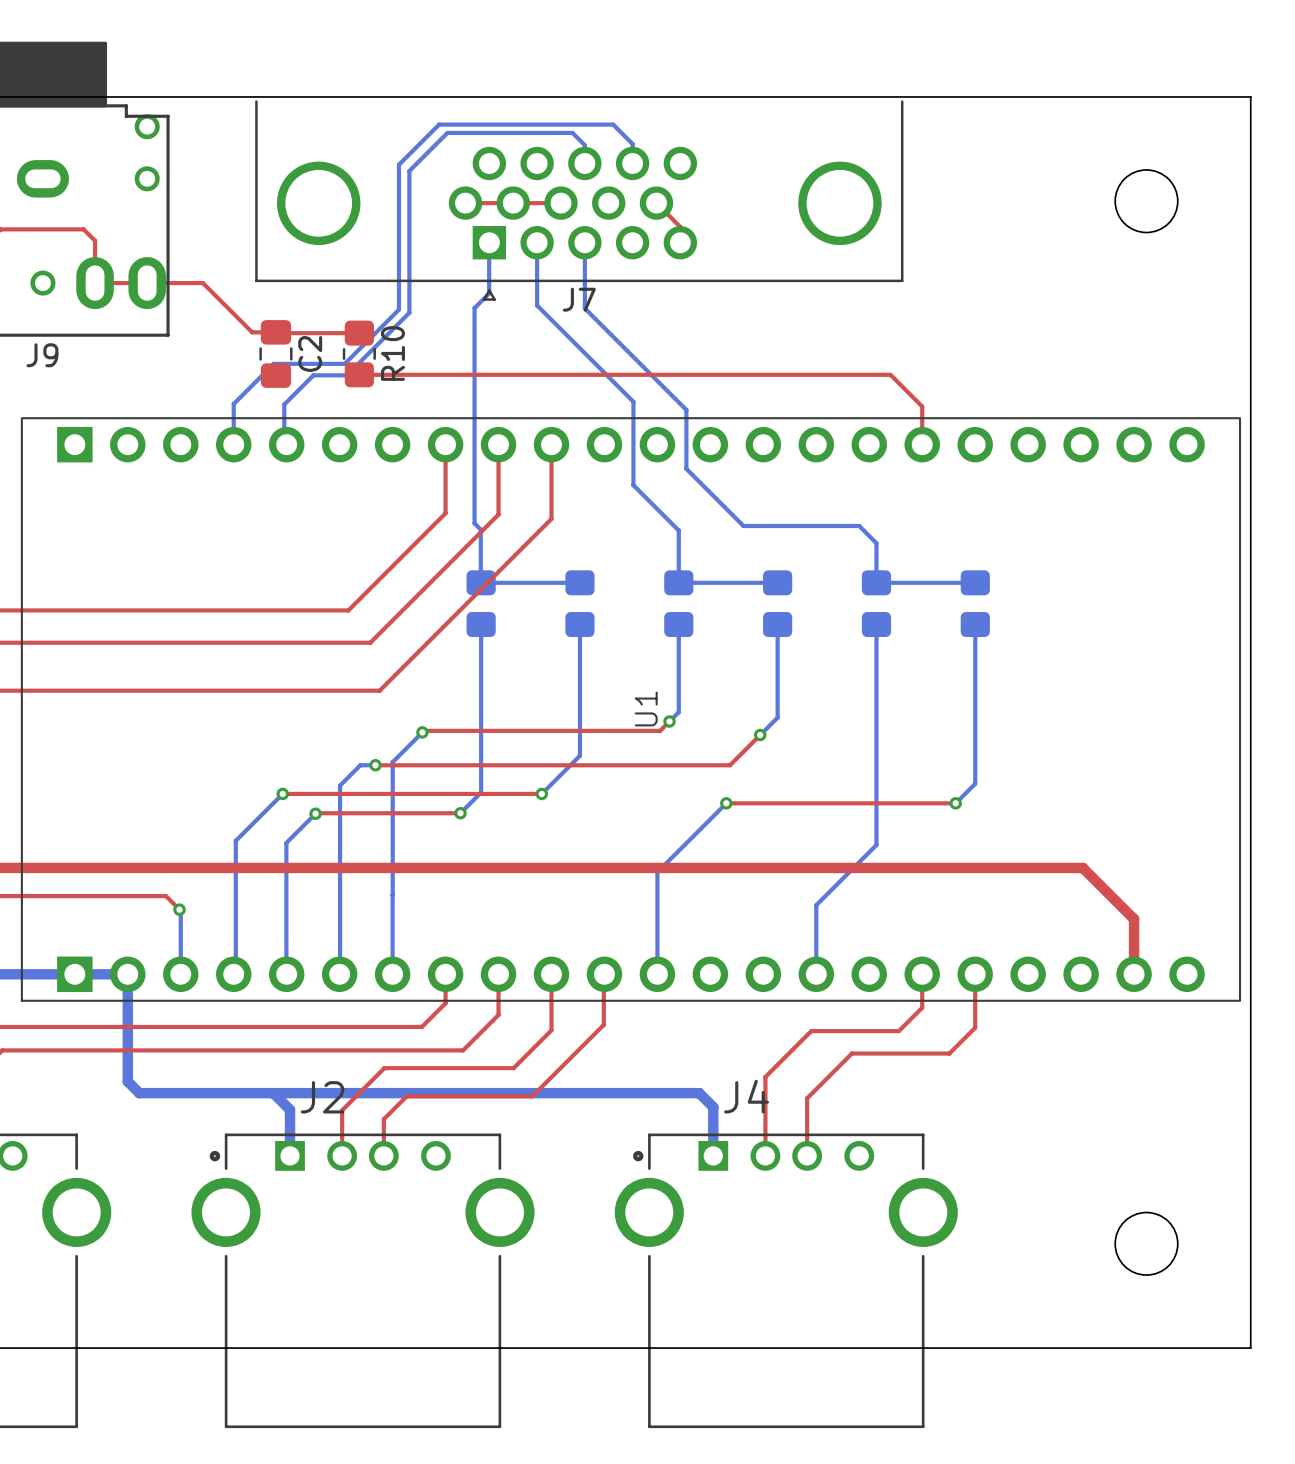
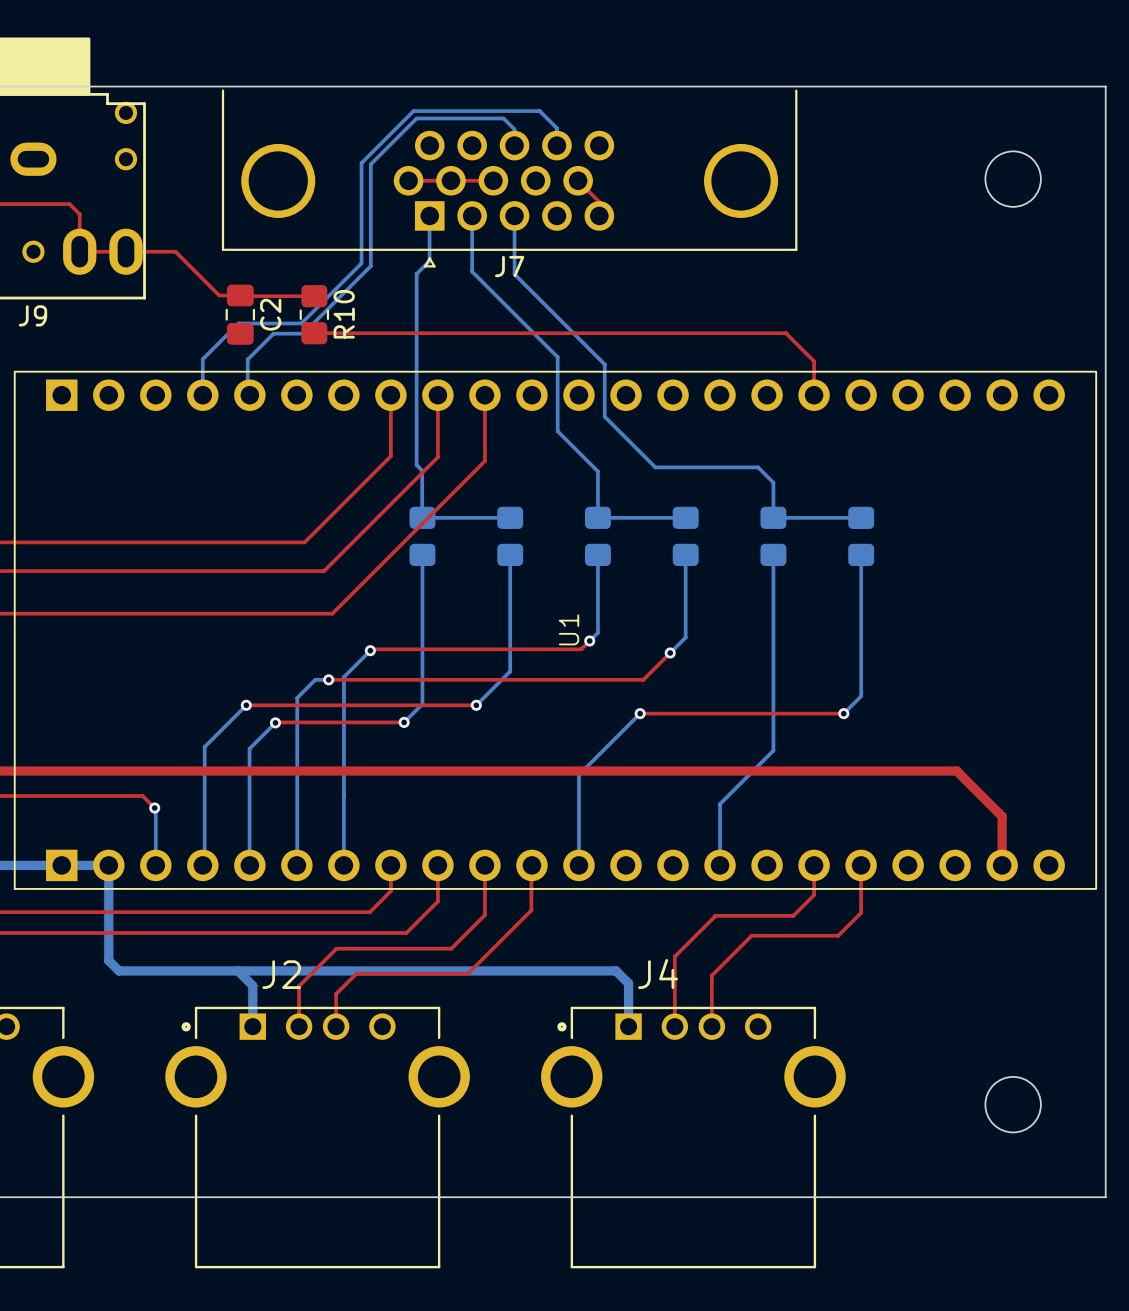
bottom track: (471, 124) (439, 124) (398, 164) (398, 309) -> (413, 111) (361, 163) (361, 263) (349, 275)
bottom track: (474, 132) (447, 132) (409, 171) (409, 312) -> (416, 118) (370, 164) (370, 266) (358, 278)

